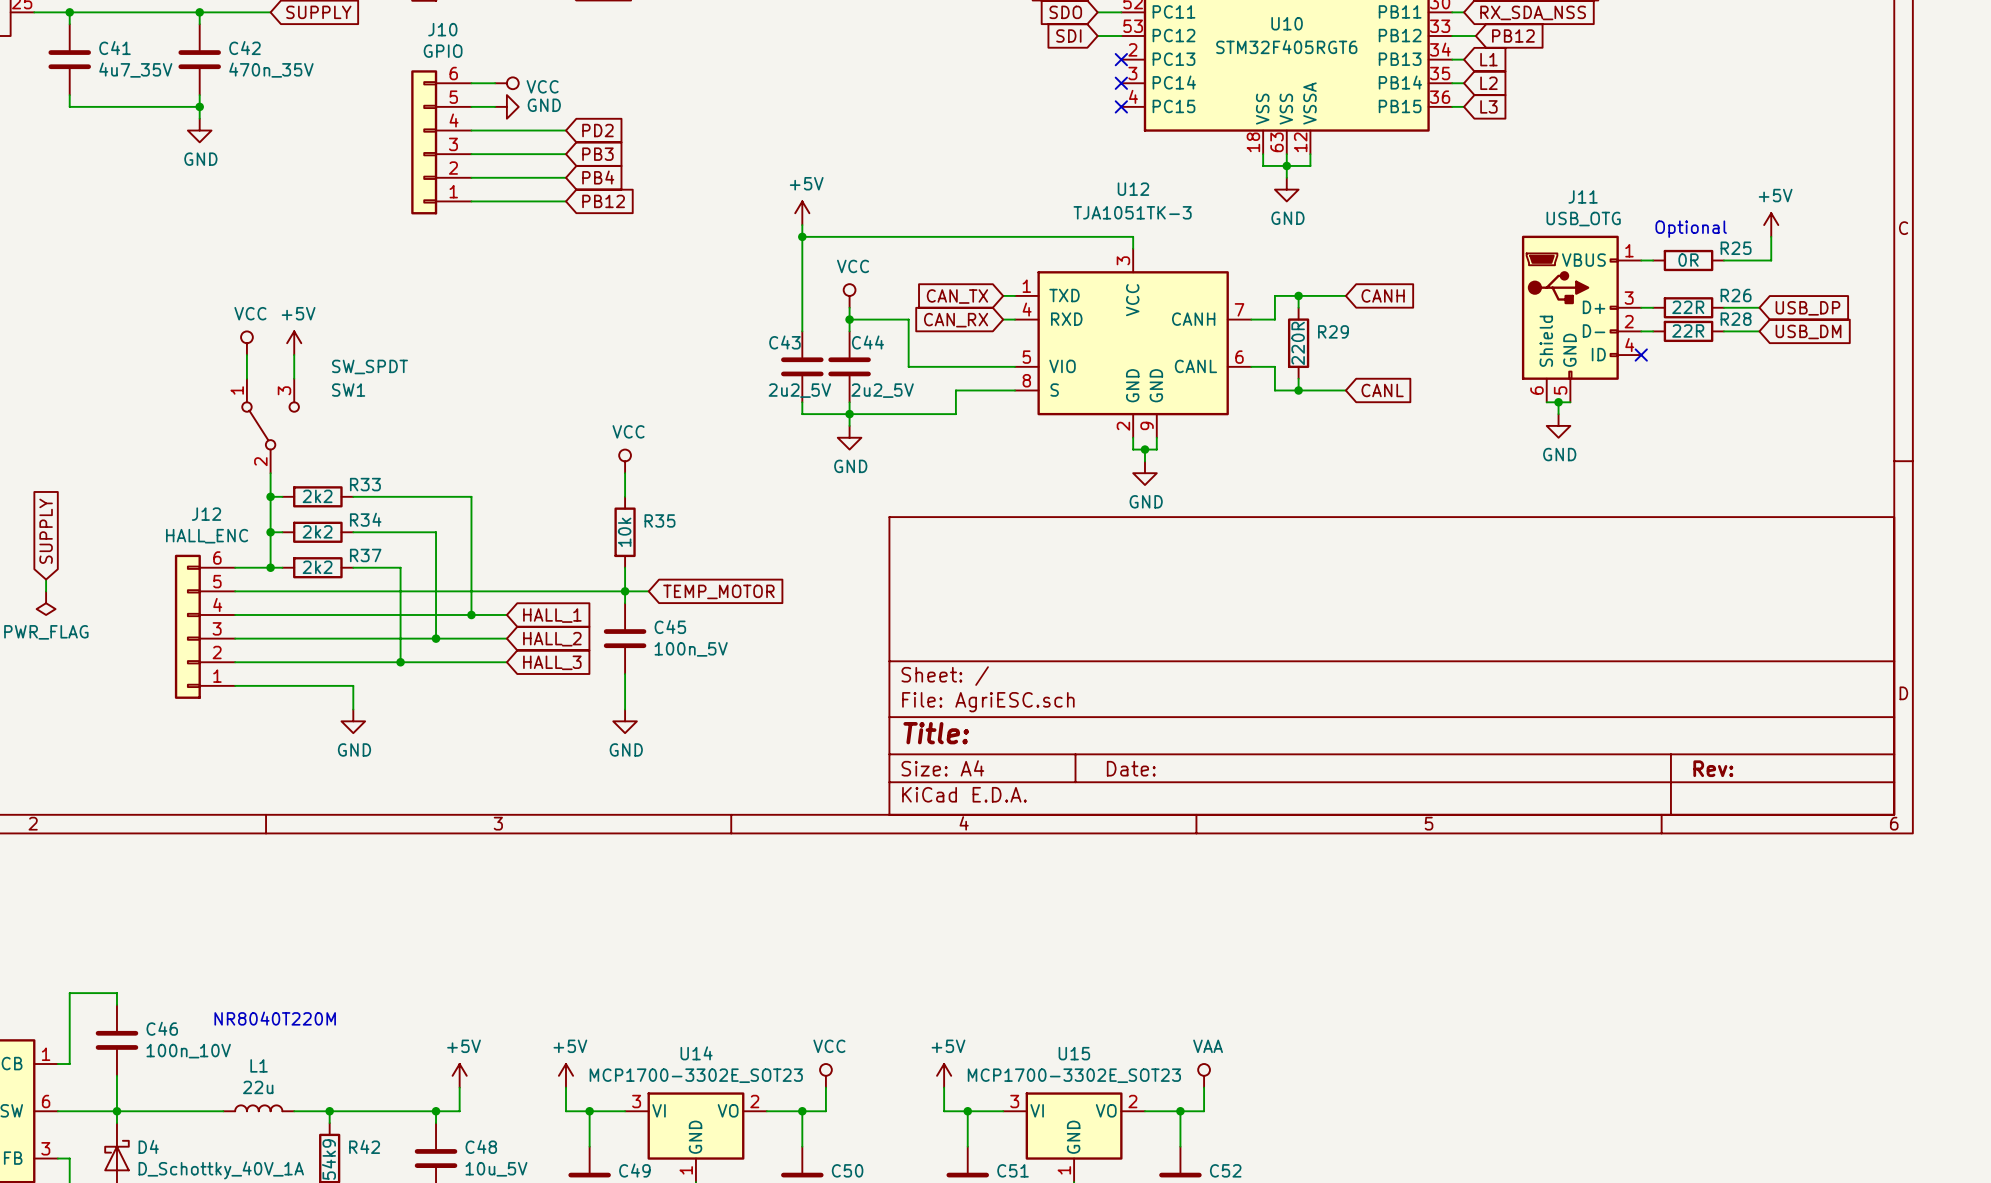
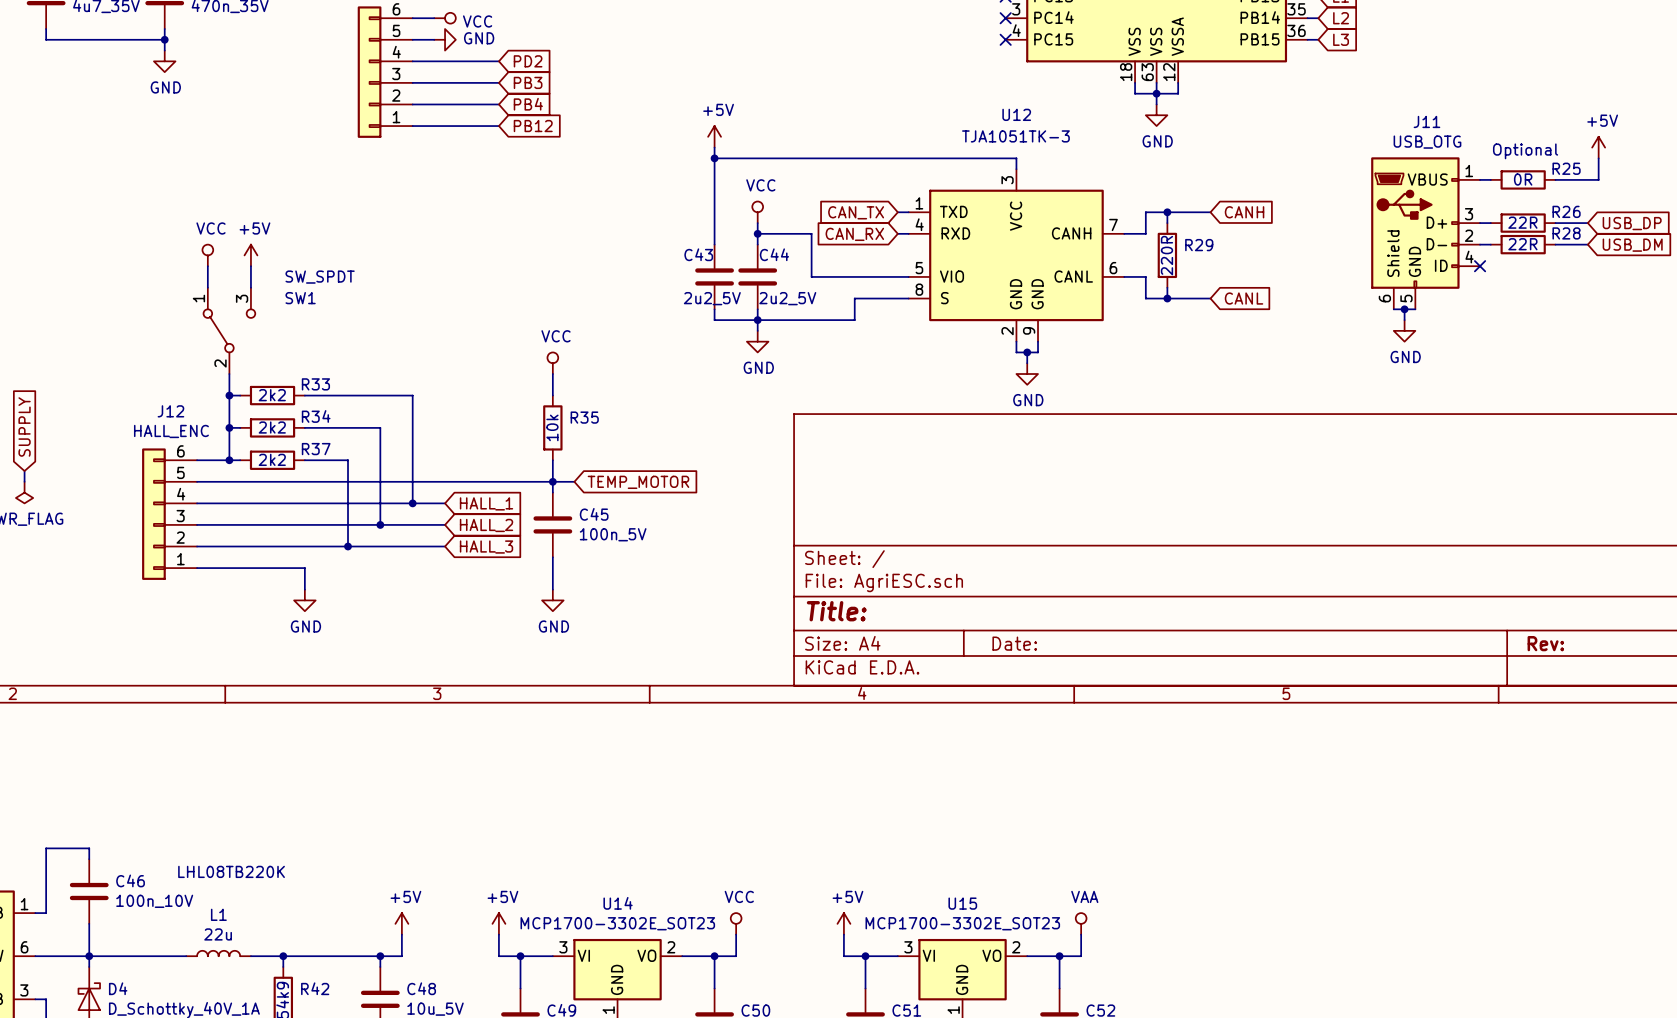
text: NR8040T220M (275, 1018) -> LHL08TB220K (231, 871)

